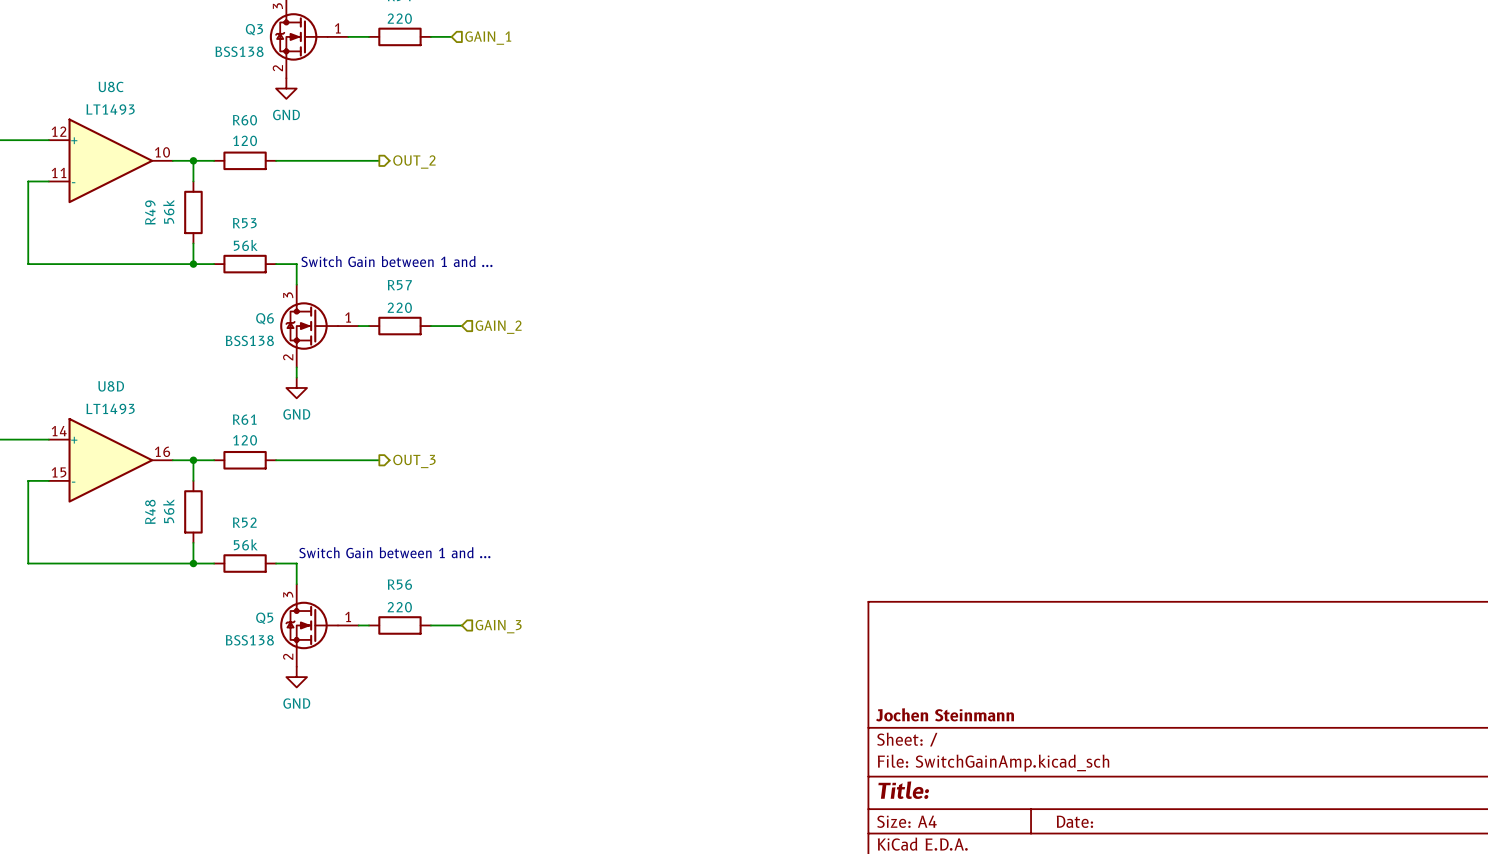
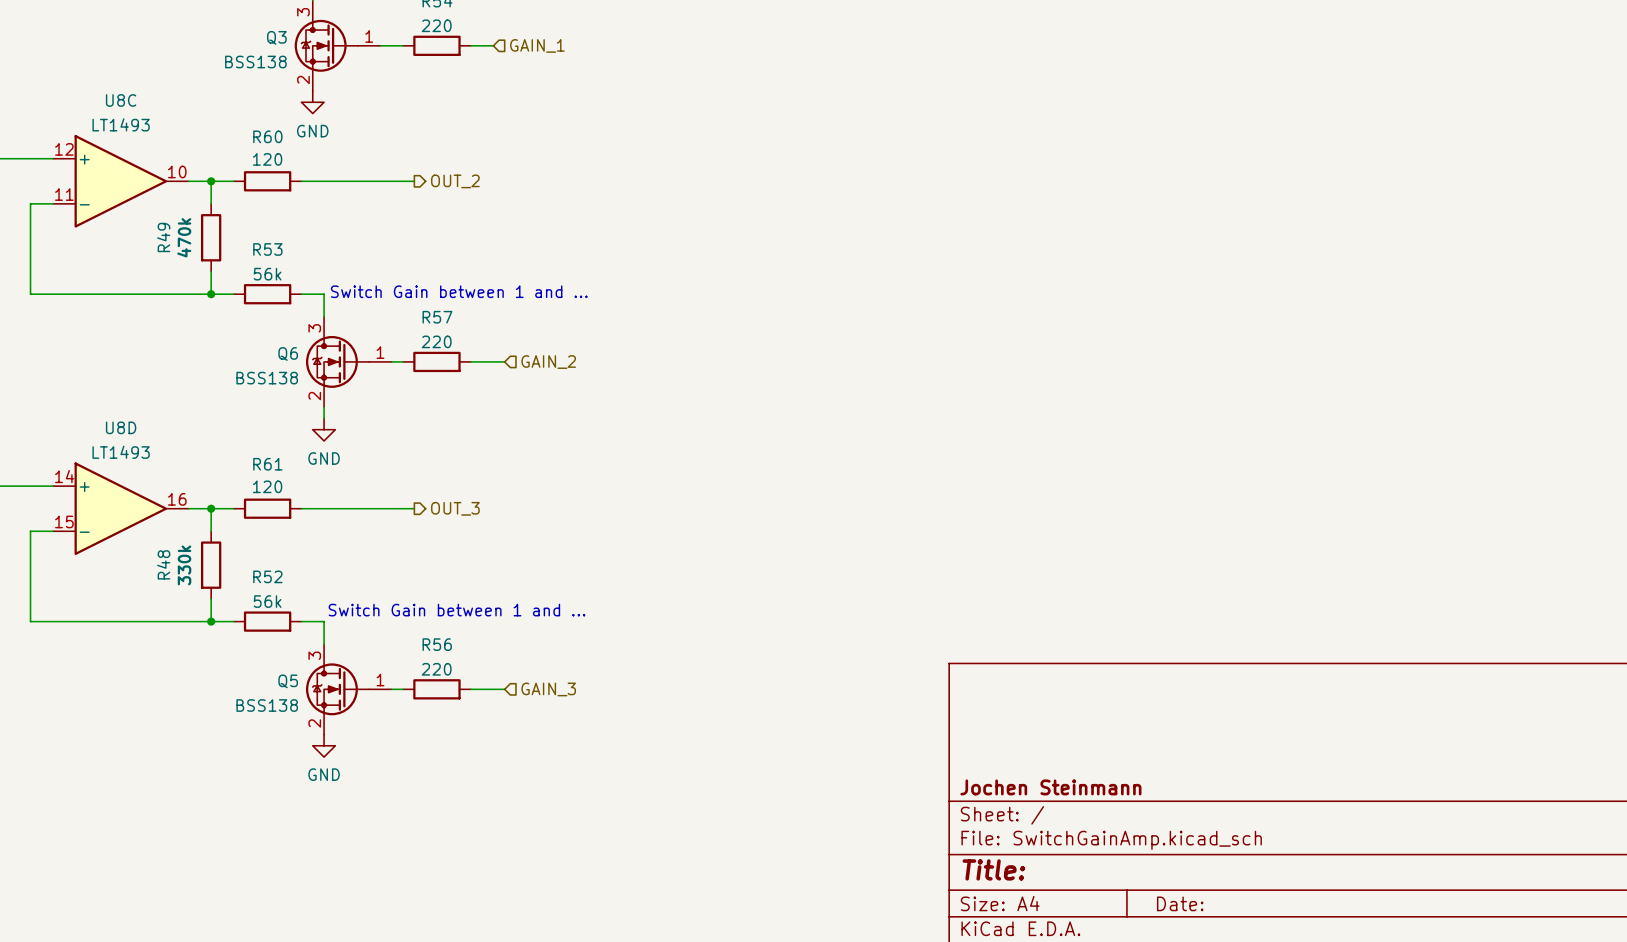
R49 value: 56k (168, 211) -> 470k (184, 237)
R48 value: 56k (168, 511) -> 330k (184, 565)

